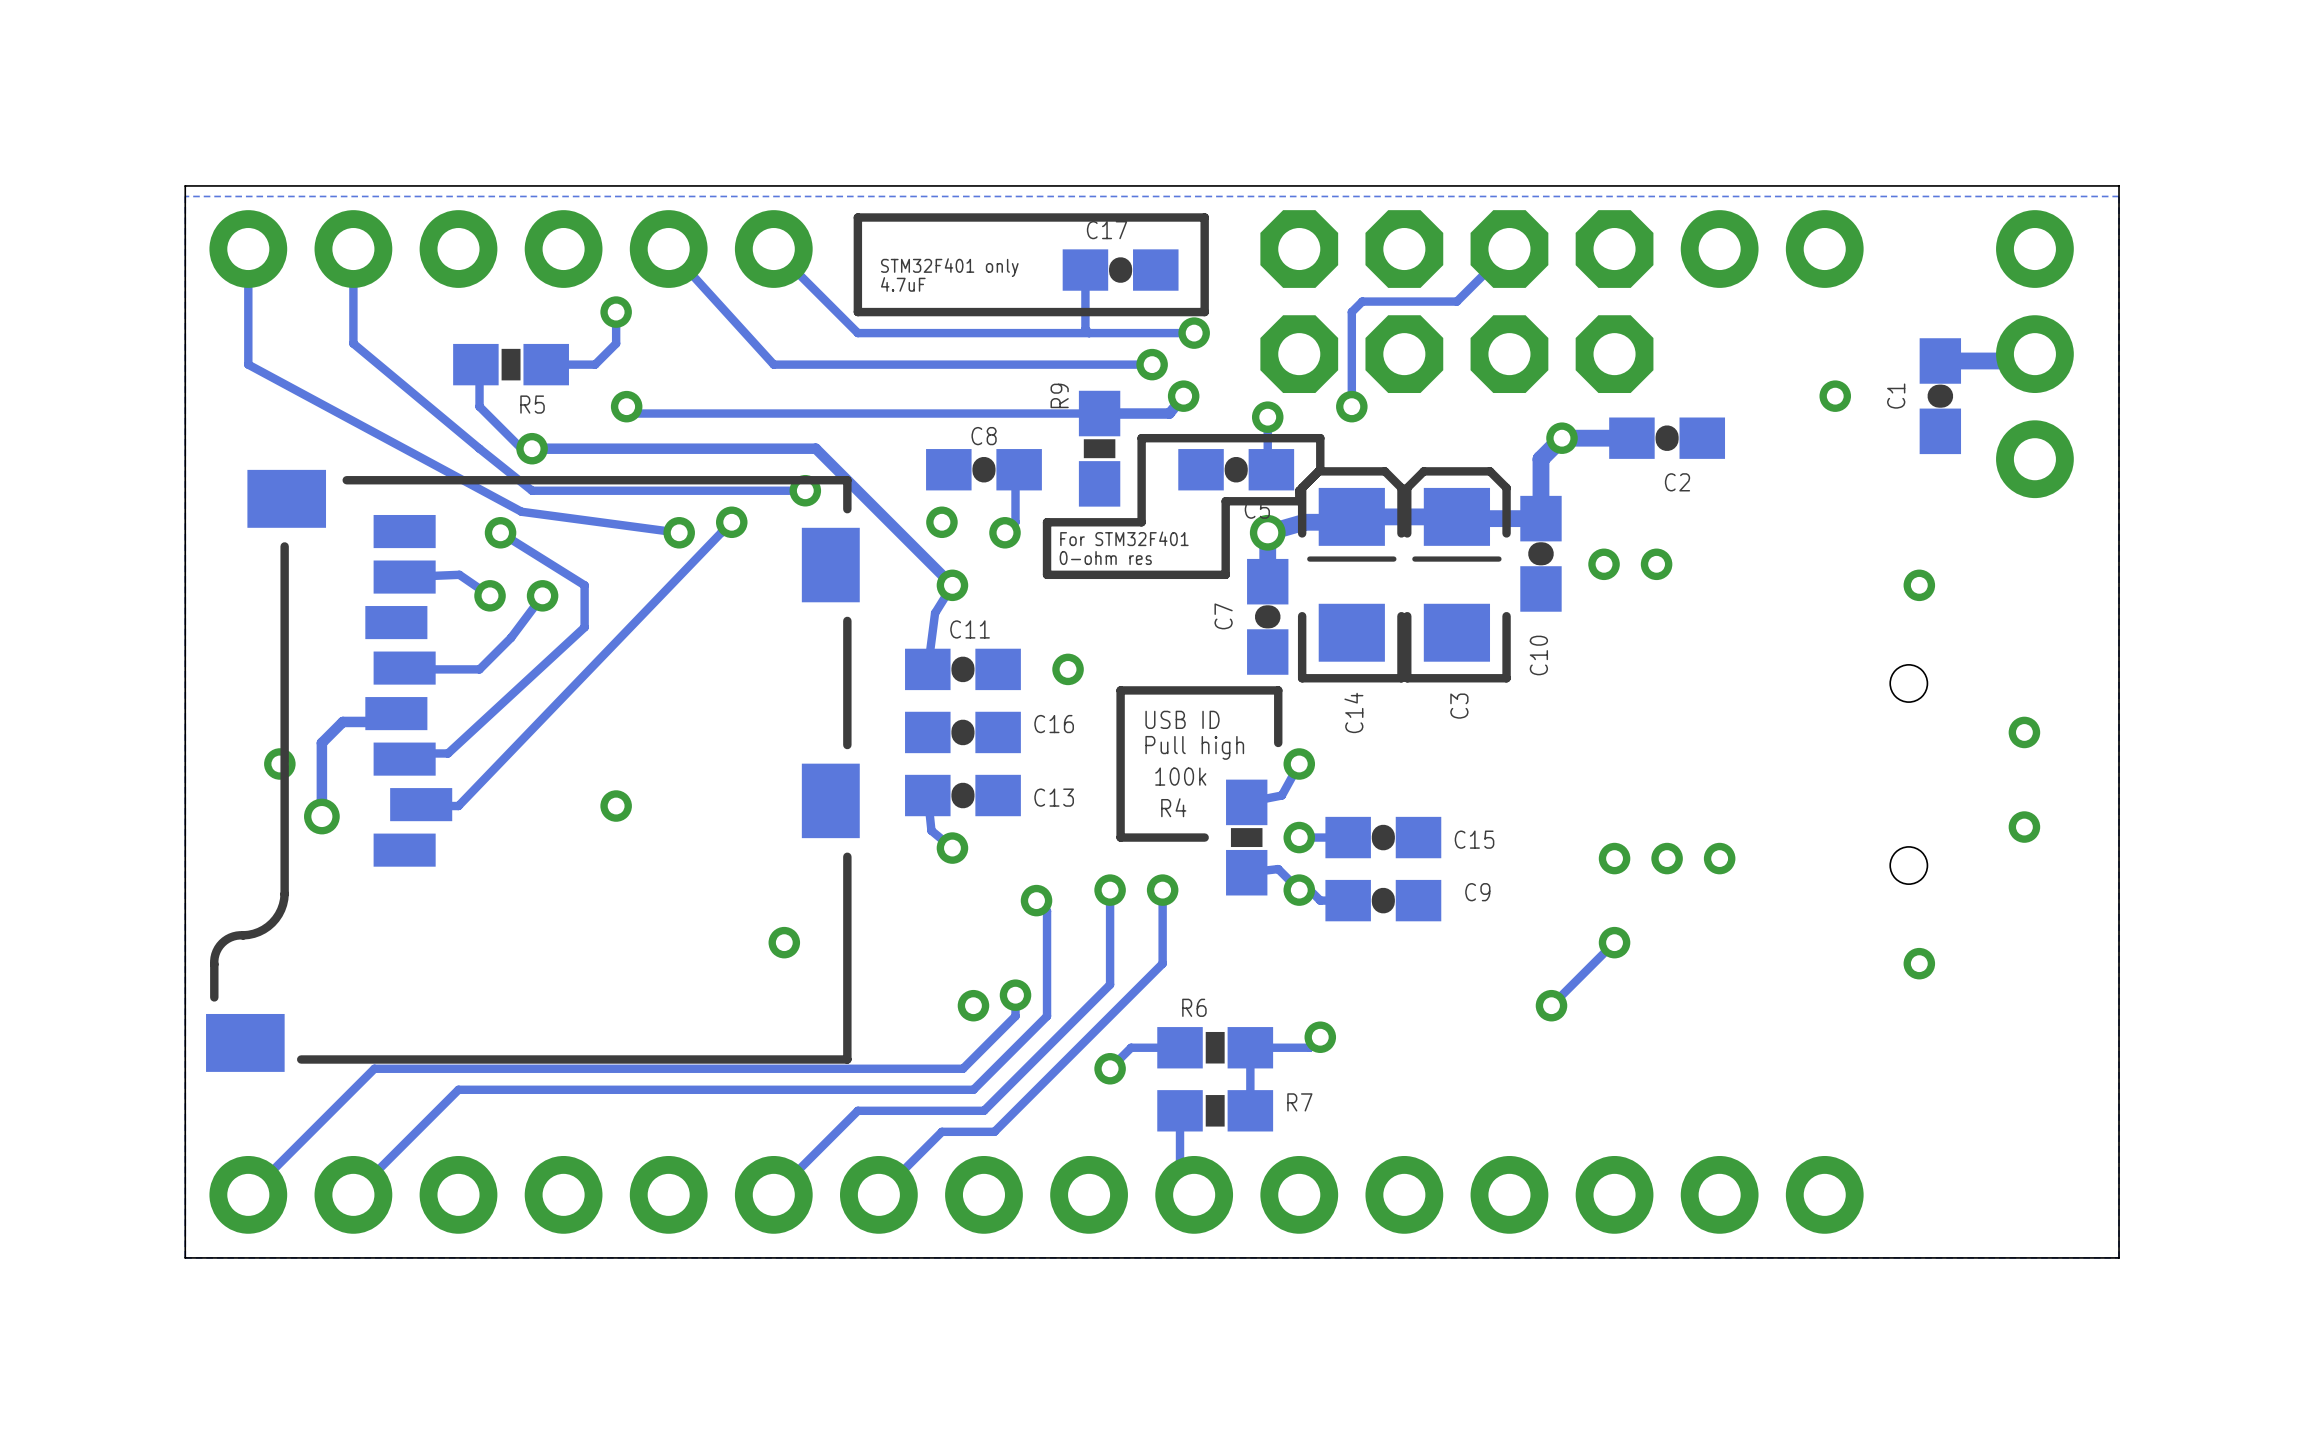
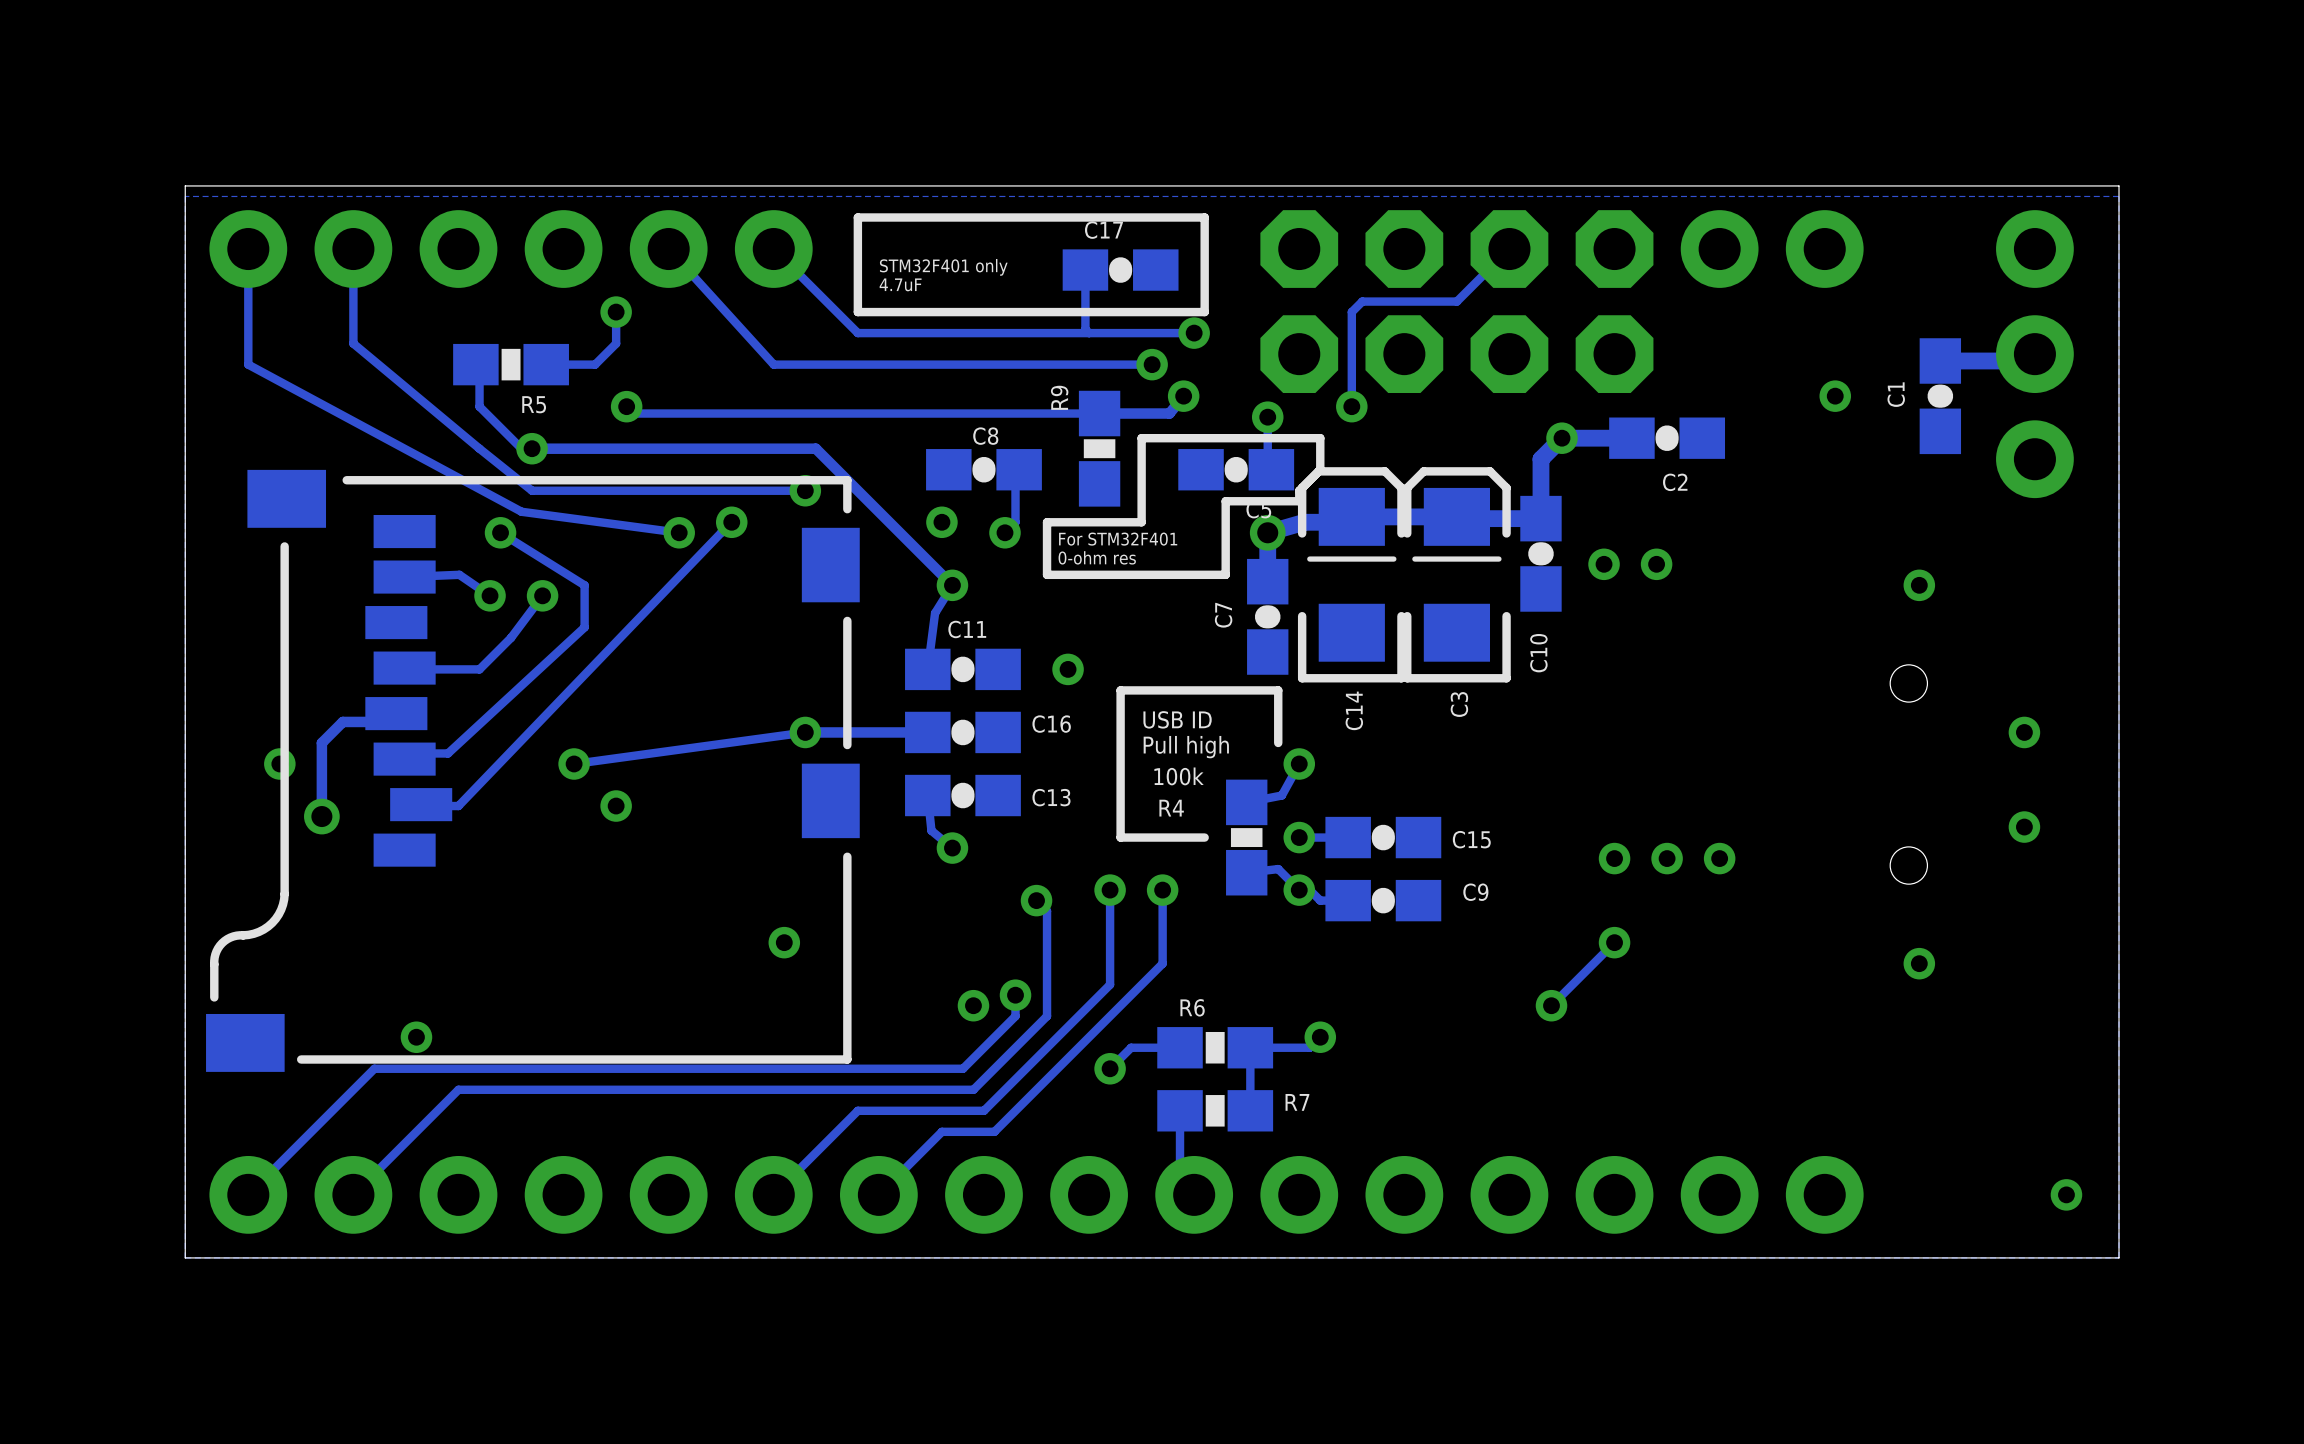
via: none -> (805, 732)
track: none -> (927, 732) (805, 732) (574, 763)
via: none -> (574, 763)
via: none -> (416, 1037)
via: none -> (2066, 1194)

